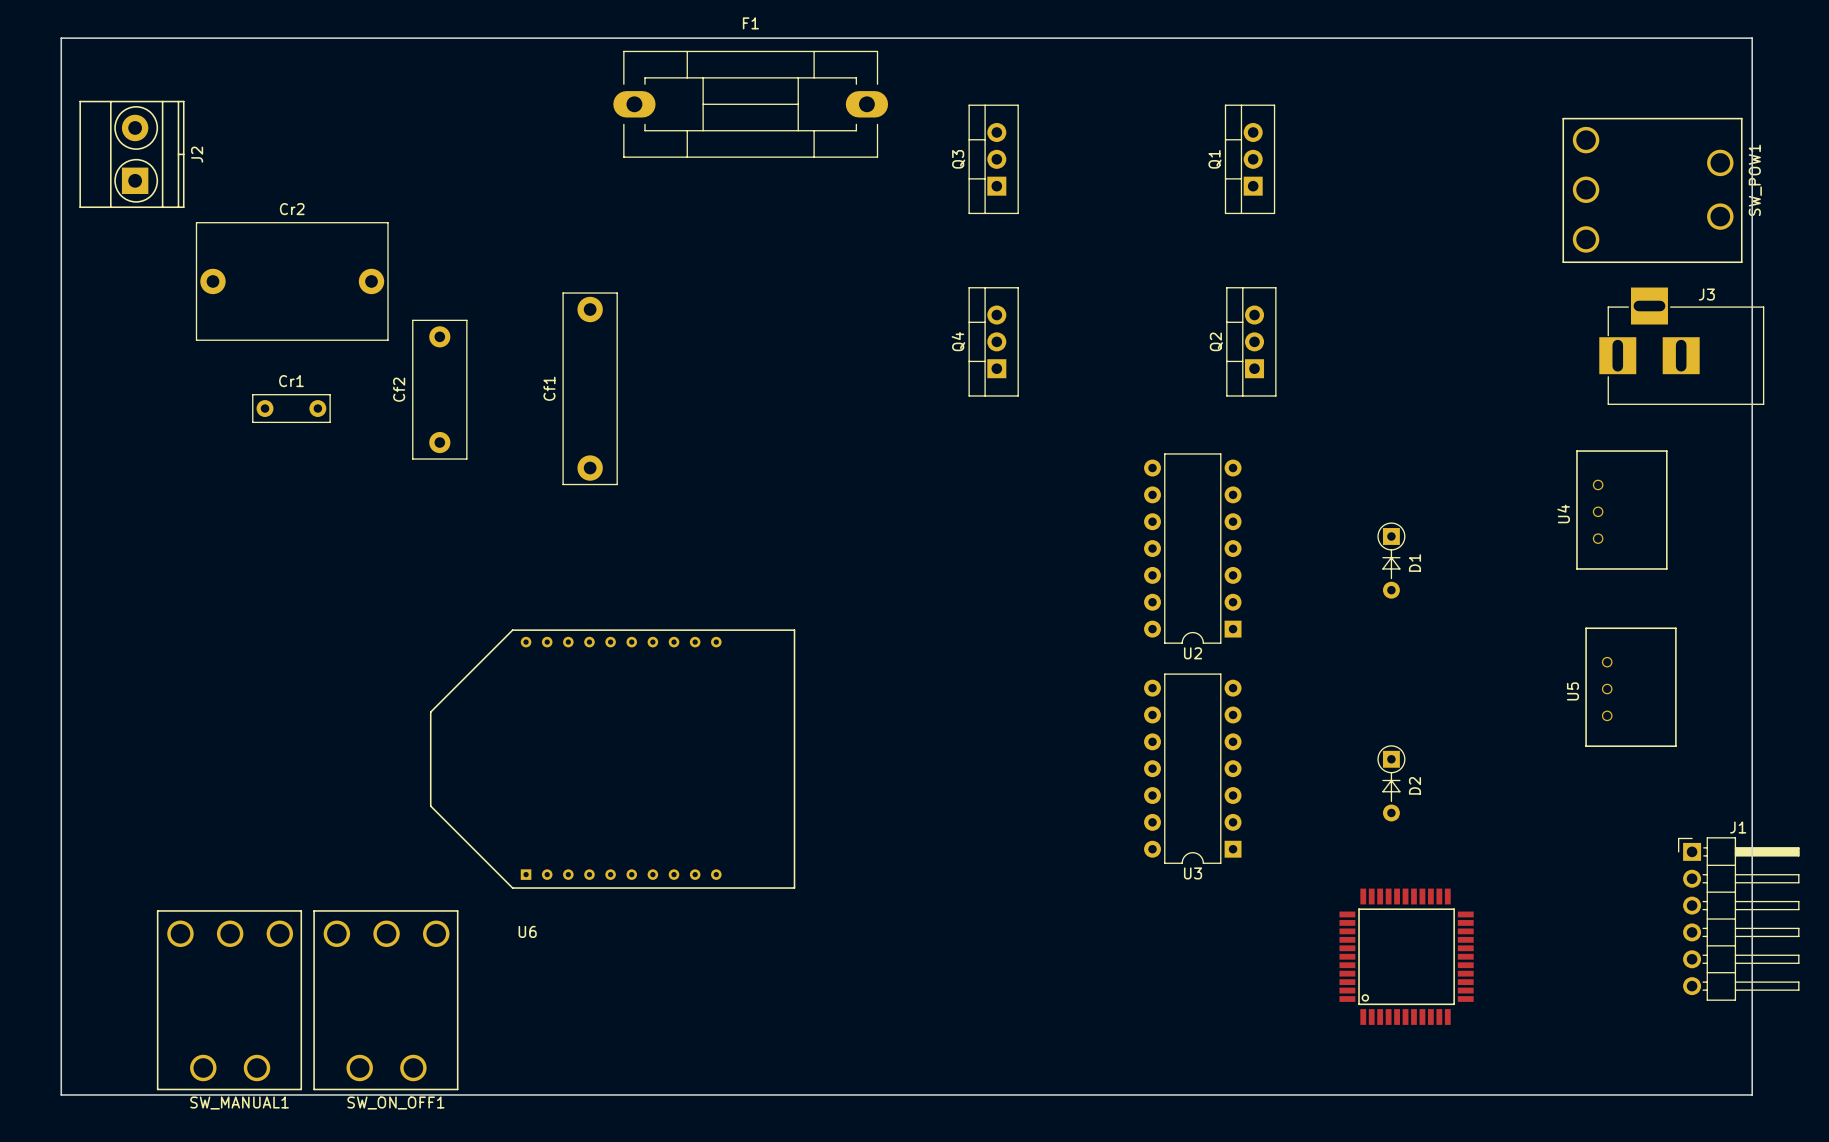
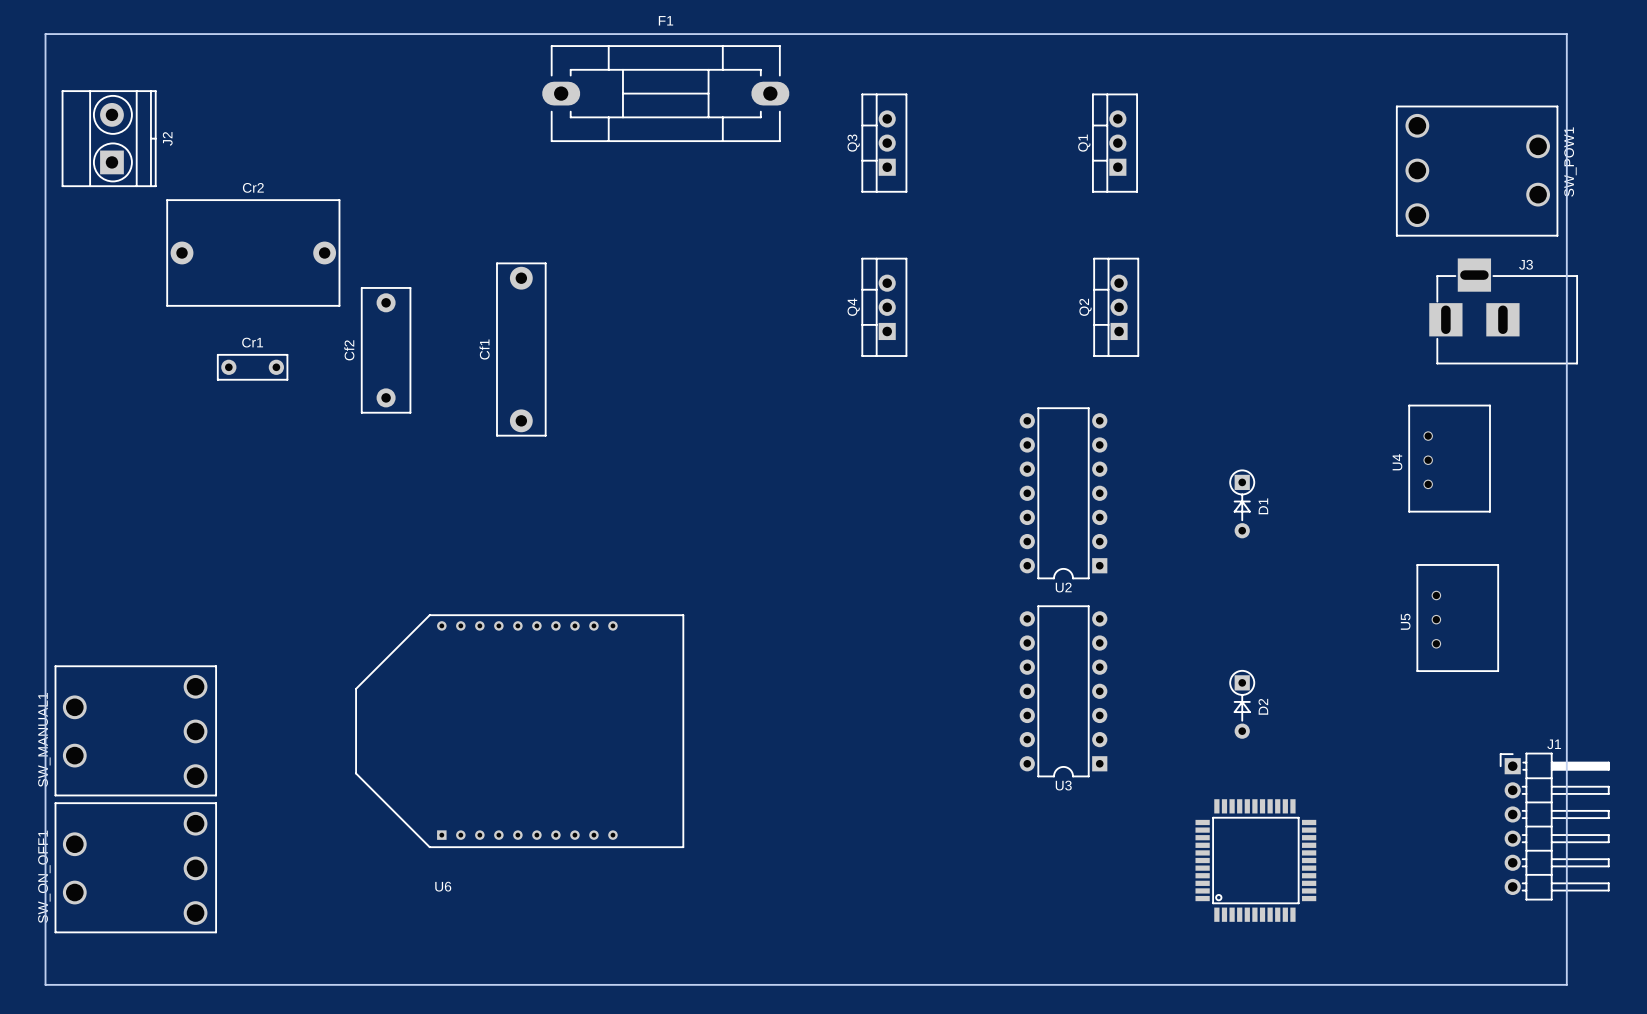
U6 position: (612, 759) -> (519, 731)
SW_MANUAL1 rotation: 0° (229, 1000) -> 90° clockwise (135, 730)
SW_MANUAL1 position: (229, 1000) -> (135, 730)
SW_ON_OFF1 rotation: 0° (385, 1000) -> 90° clockwise (135, 867)
SW_ON_OFF1 position: (385, 1000) -> (135, 867)

